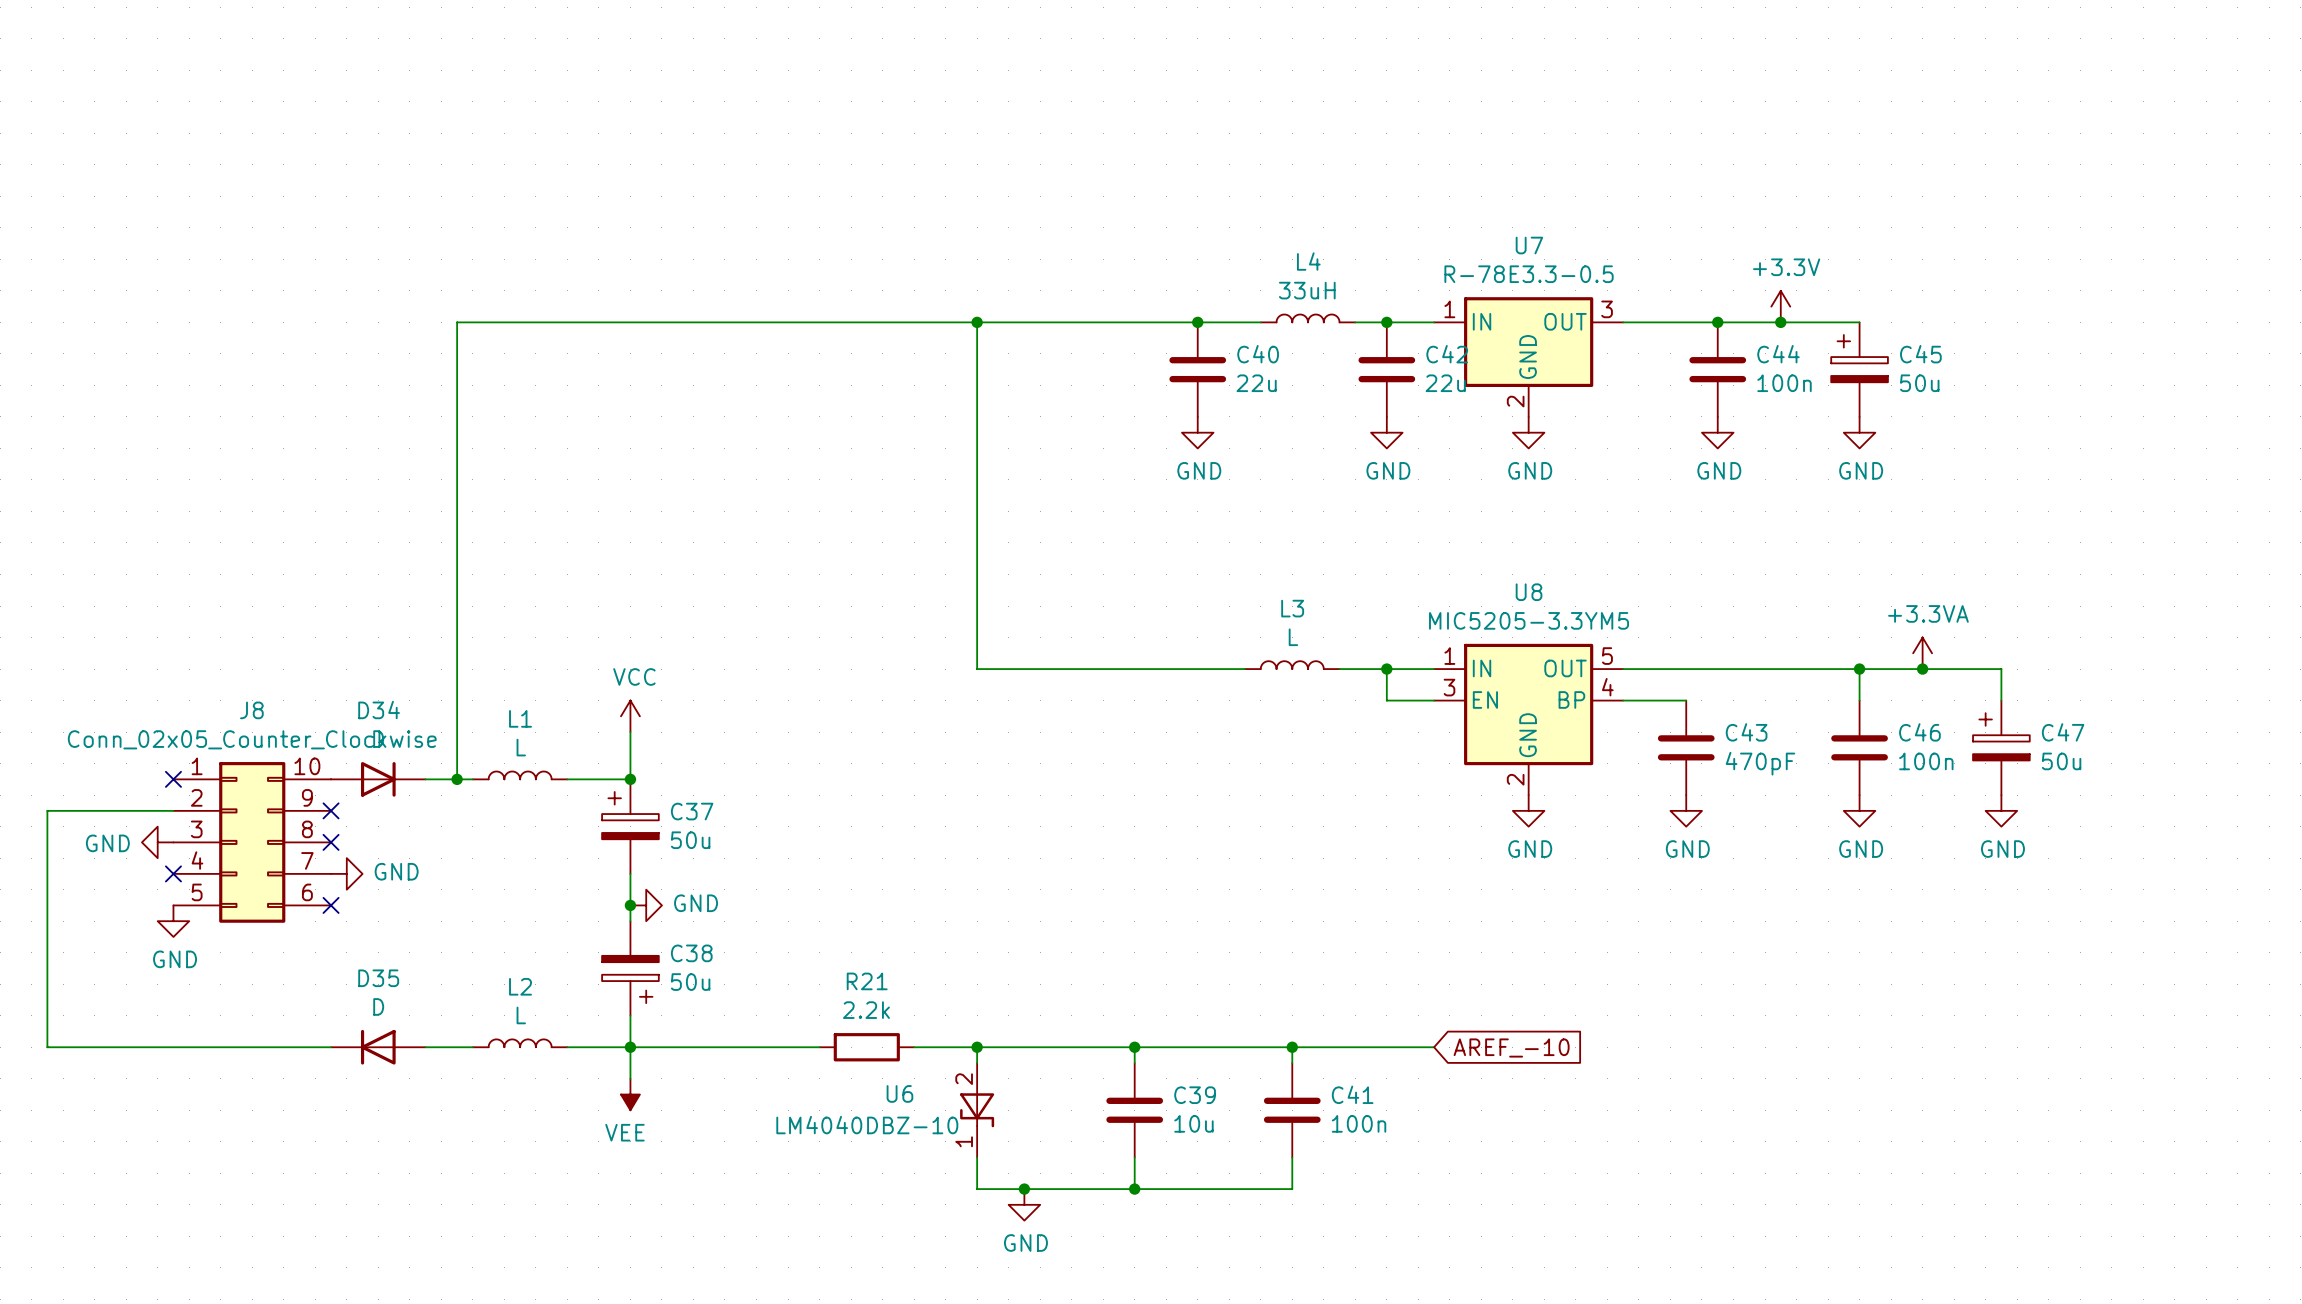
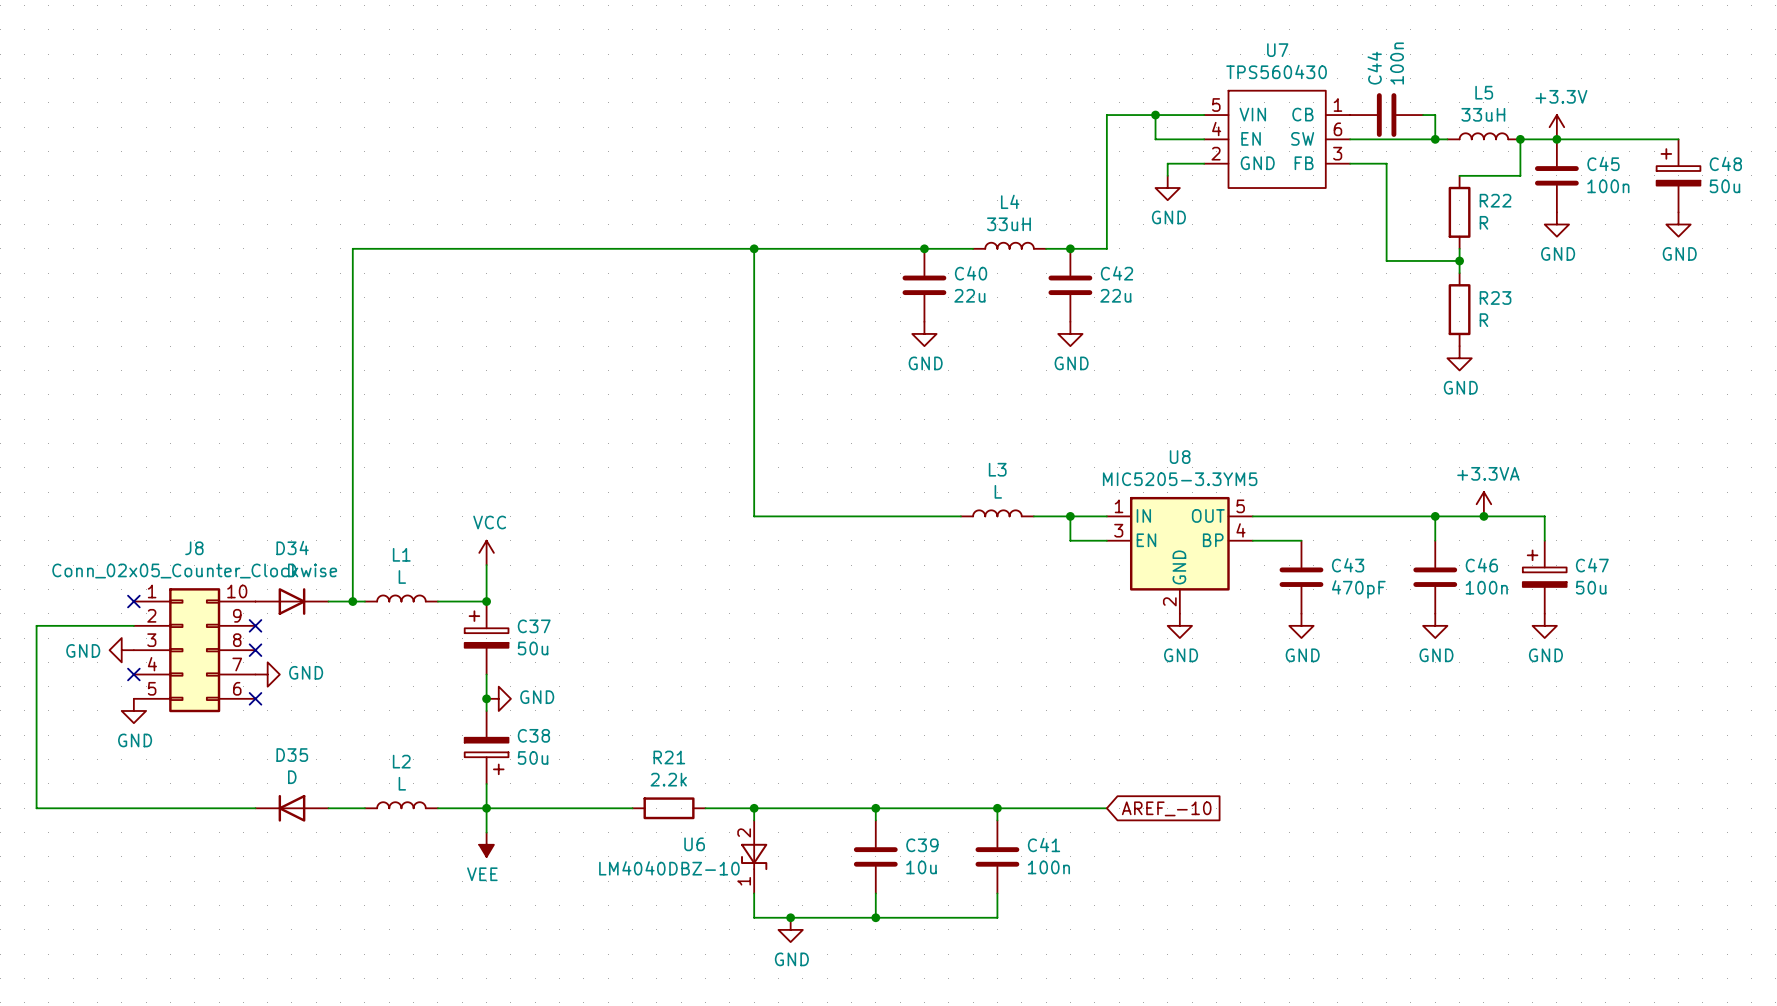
wire: none -> (1155, 115) (1155, 139) (1204, 139)
junction: none -> (1155, 115)
wire: none -> (1204, 115) (1106, 115) (1106, 248)
wire: none -> (1423, 115) (1435, 115) (1435, 139)
L5: none -> 33uH (1483, 136)
wire: none -> (1350, 139) (1447, 139)
junction: none -> (1435, 139)
junction: none -> (1520, 139)
junction: none -> (1556, 139)
wire: none -> (1678, 139) (1520, 139) (1520, 175) (1459, 175)
wire: none -> (1204, 163) (1167, 163) (1167, 175)
wire: none -> (1350, 163) (1386, 163) (1386, 260) (1459, 260)
C48: none -> 50u (1678, 175)
power symbol: none -> GND (1167, 188)
U7 value: R-78E3.3-0.5 (1529, 274) -> TPS560430 (1276, 71)
R22: none -> R (1459, 212)
power symbol: none -> GND (1556, 224)
power symbol: none -> GND (1678, 224)
U7 symbol: [1434, 297, 1624, 417] -> [1204, 90, 1351, 189]
power symbol position: +3.3V (1780, 306) -> +3.3V (1556, 127)
wire: (1623, 322) (1859, 322) -> none
junction: (1717, 322) -> none
junction: (1780, 322) -> none
C45 symbol: [1831, 322, 1888, 417] -> [1534, 139, 1579, 213]
wire: none -> (1459, 248) (1459, 273)
junction: none -> (1459, 260)
C44 name position: C44 (1778, 354) -> C44 (1374, 68)
C44 rotation: 0° (1717, 369) -> 90° clockwise (1386, 115)
C44 position: (1717, 369) -> (1386, 115)
C44 value position: 100n (1784, 383) -> 100n (1397, 63)
C45 value: 50u (1919, 383) -> 100n (1608, 186)
R23: none -> R (1459, 309)
power symbol: GND (1528, 432) -> none
power symbol: GND (1717, 432) -> none
power symbol position: GND (1859, 432) -> GND (1459, 358)

